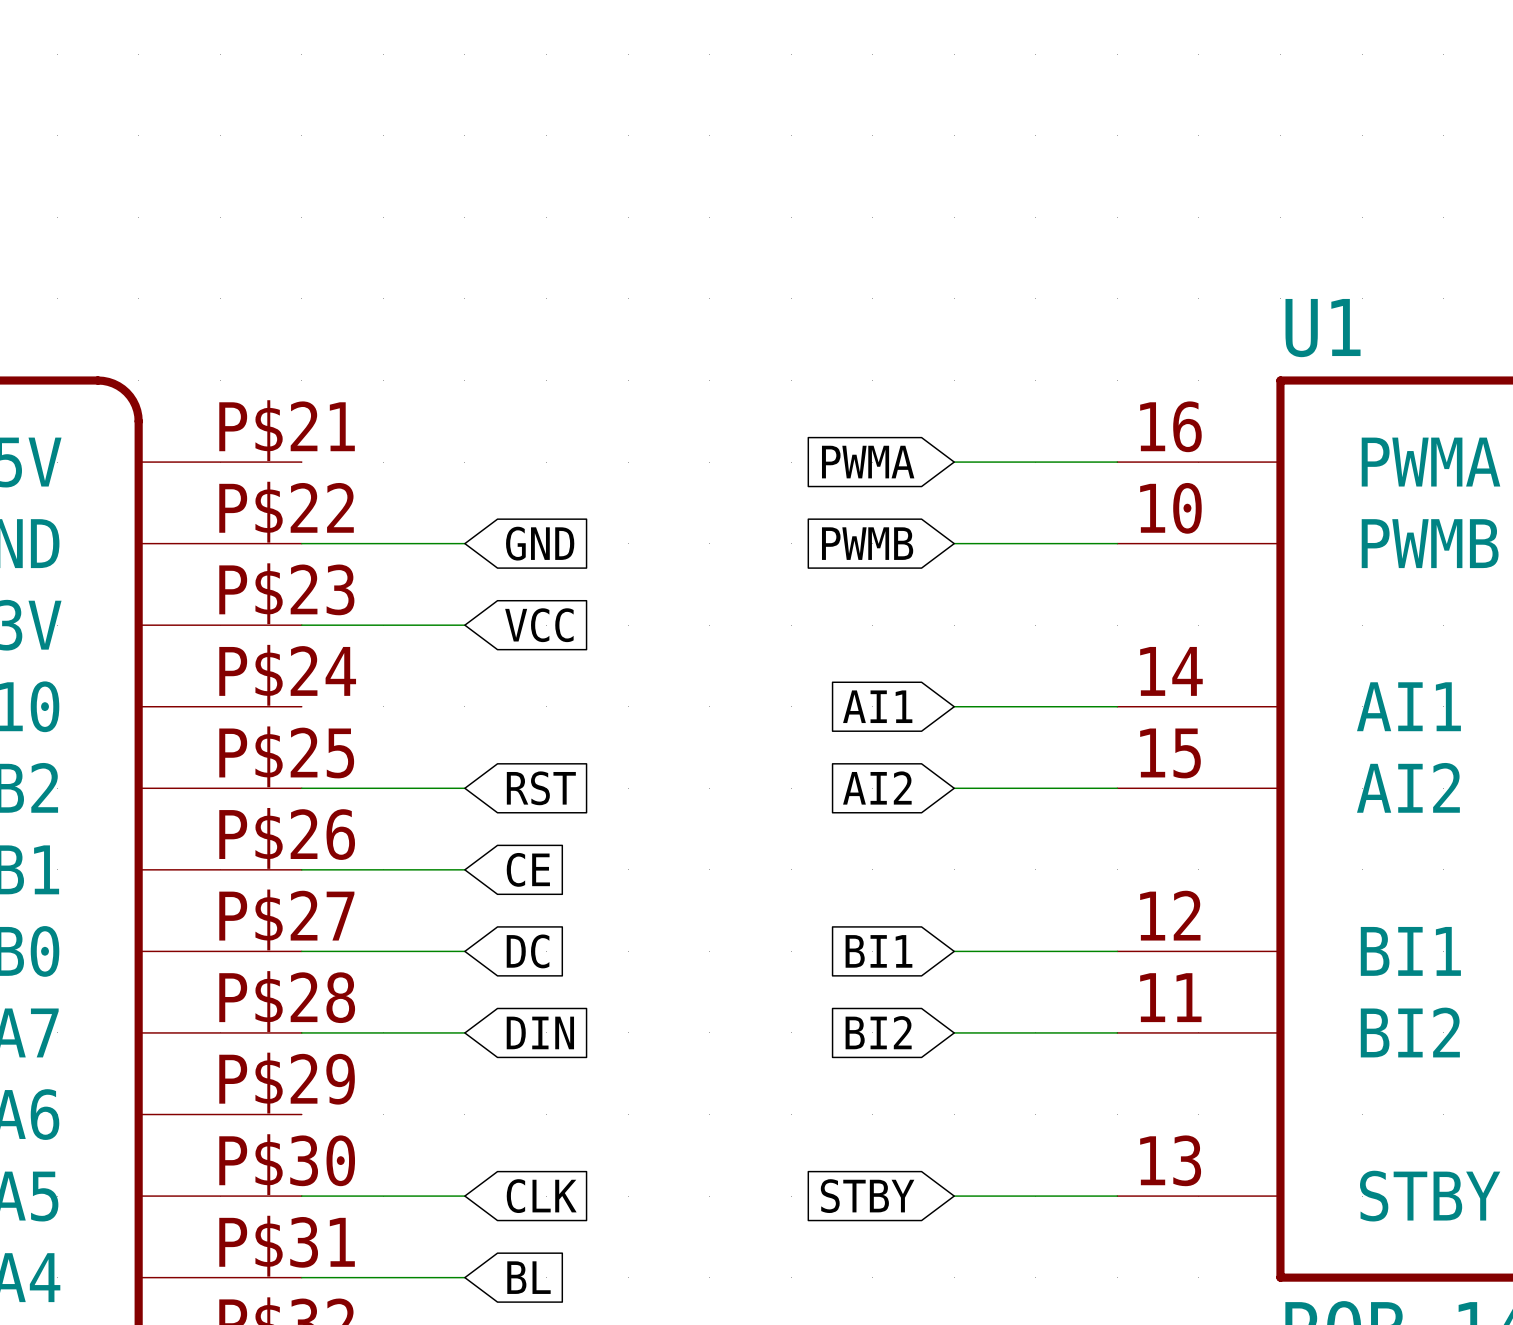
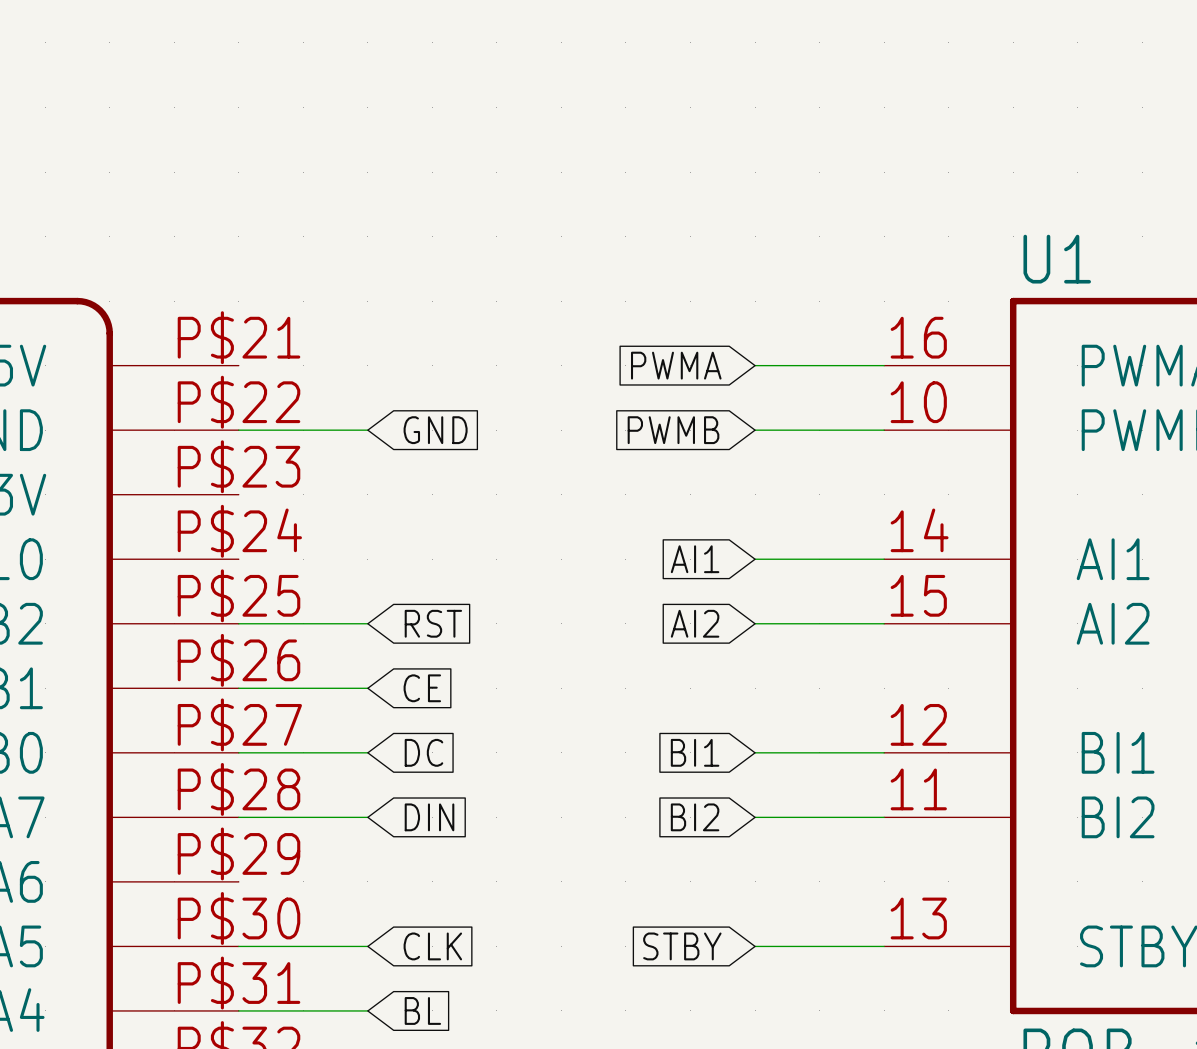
wire: (301, 625) (464, 625) -> none
global label: VCC (539, 625) -> none

